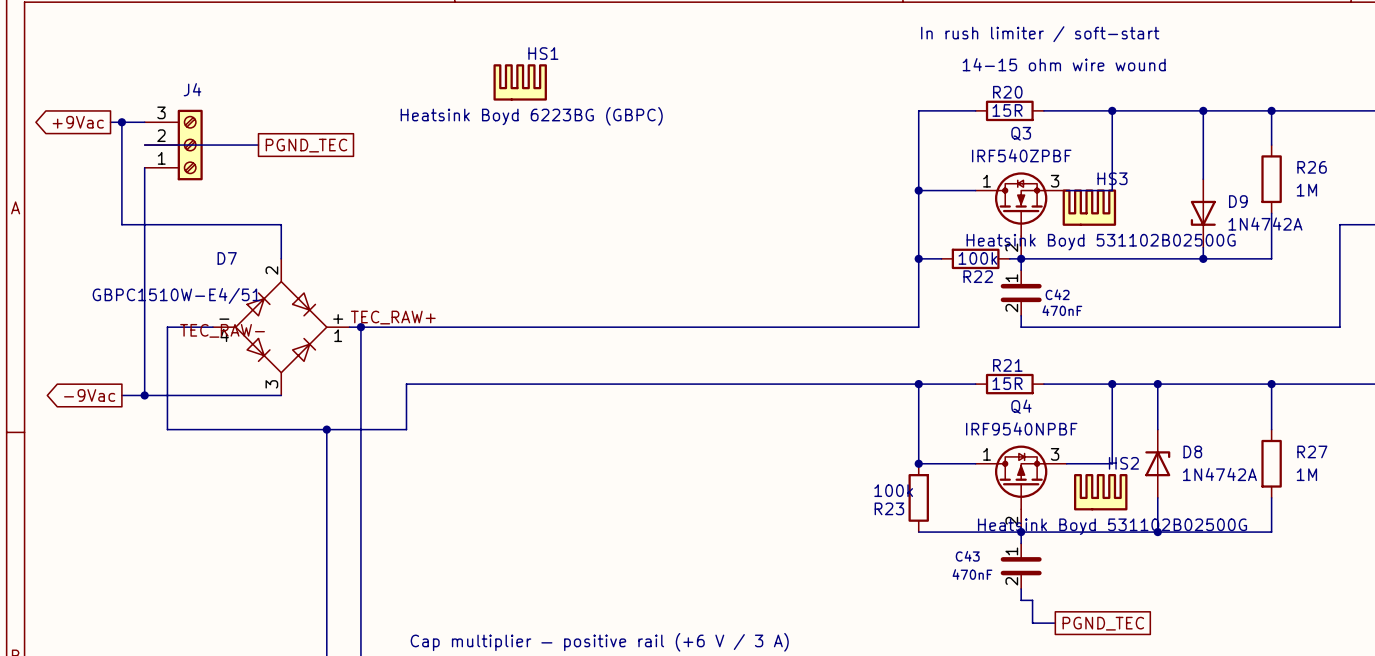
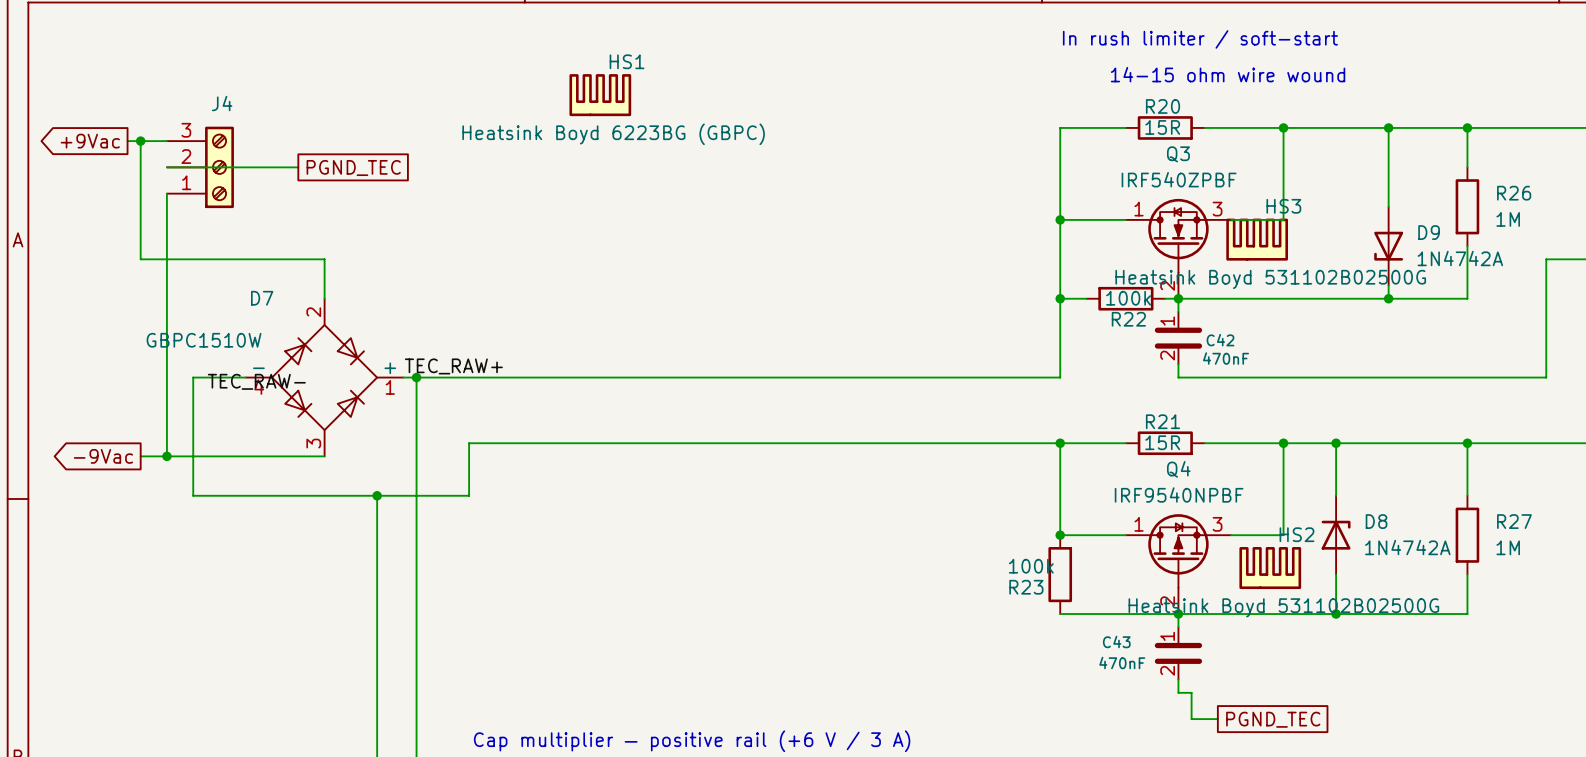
D7 value: GBPC1510W-E4/51 (176, 295) -> GBPC1510W (204, 340)

